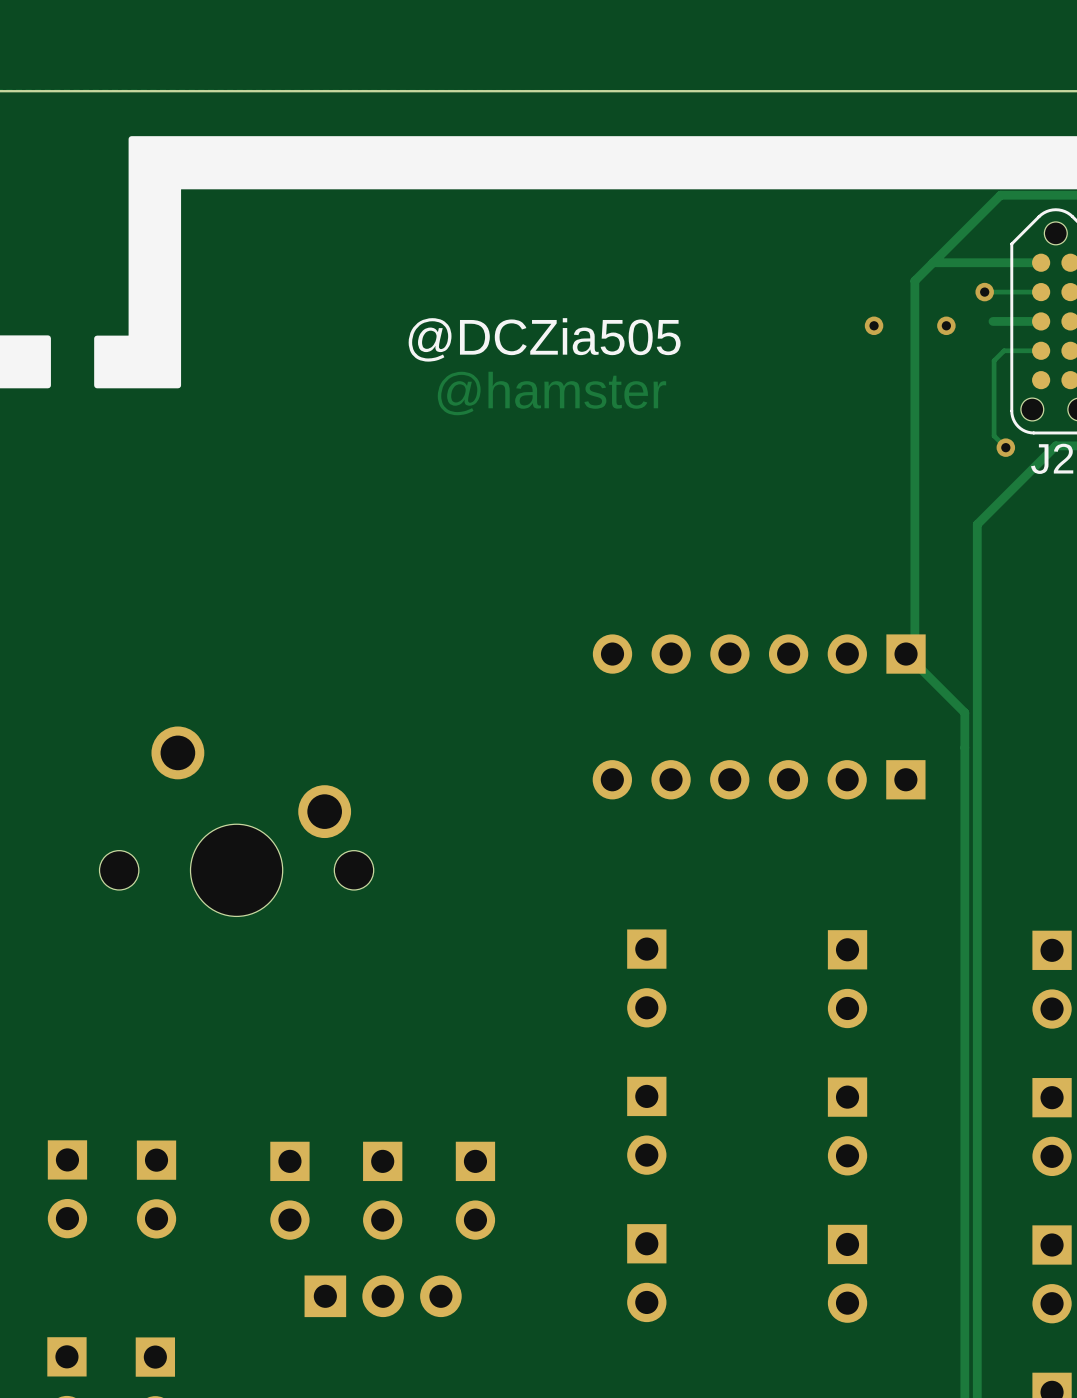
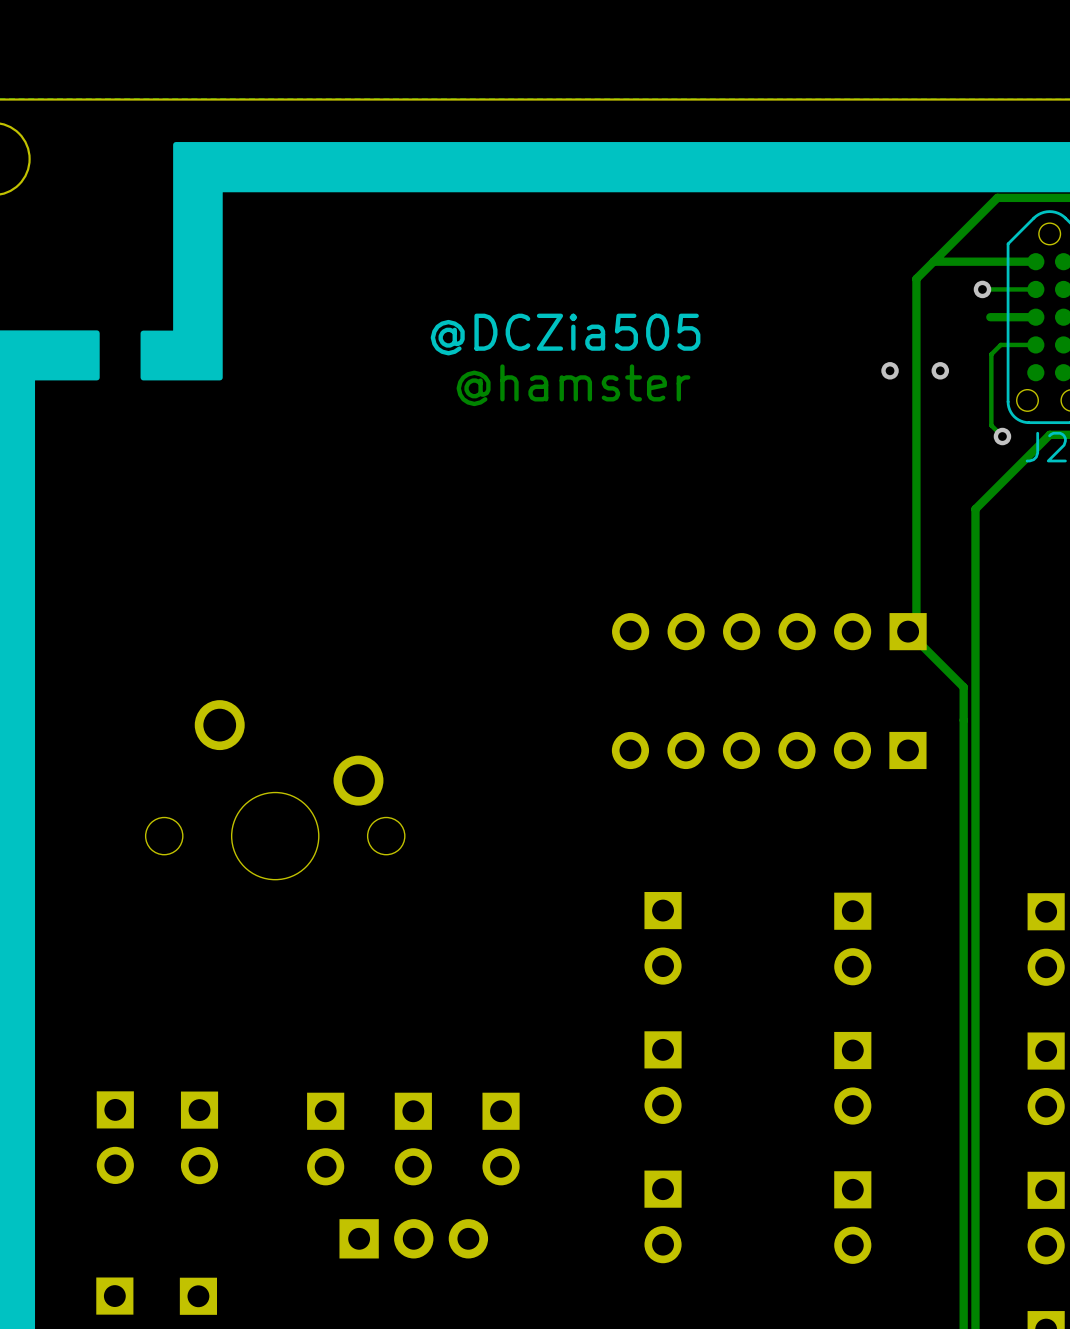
via: (874, 325) -> none
via: (946, 325) -> none
via: none -> (890, 370)
via: none -> (940, 370)

